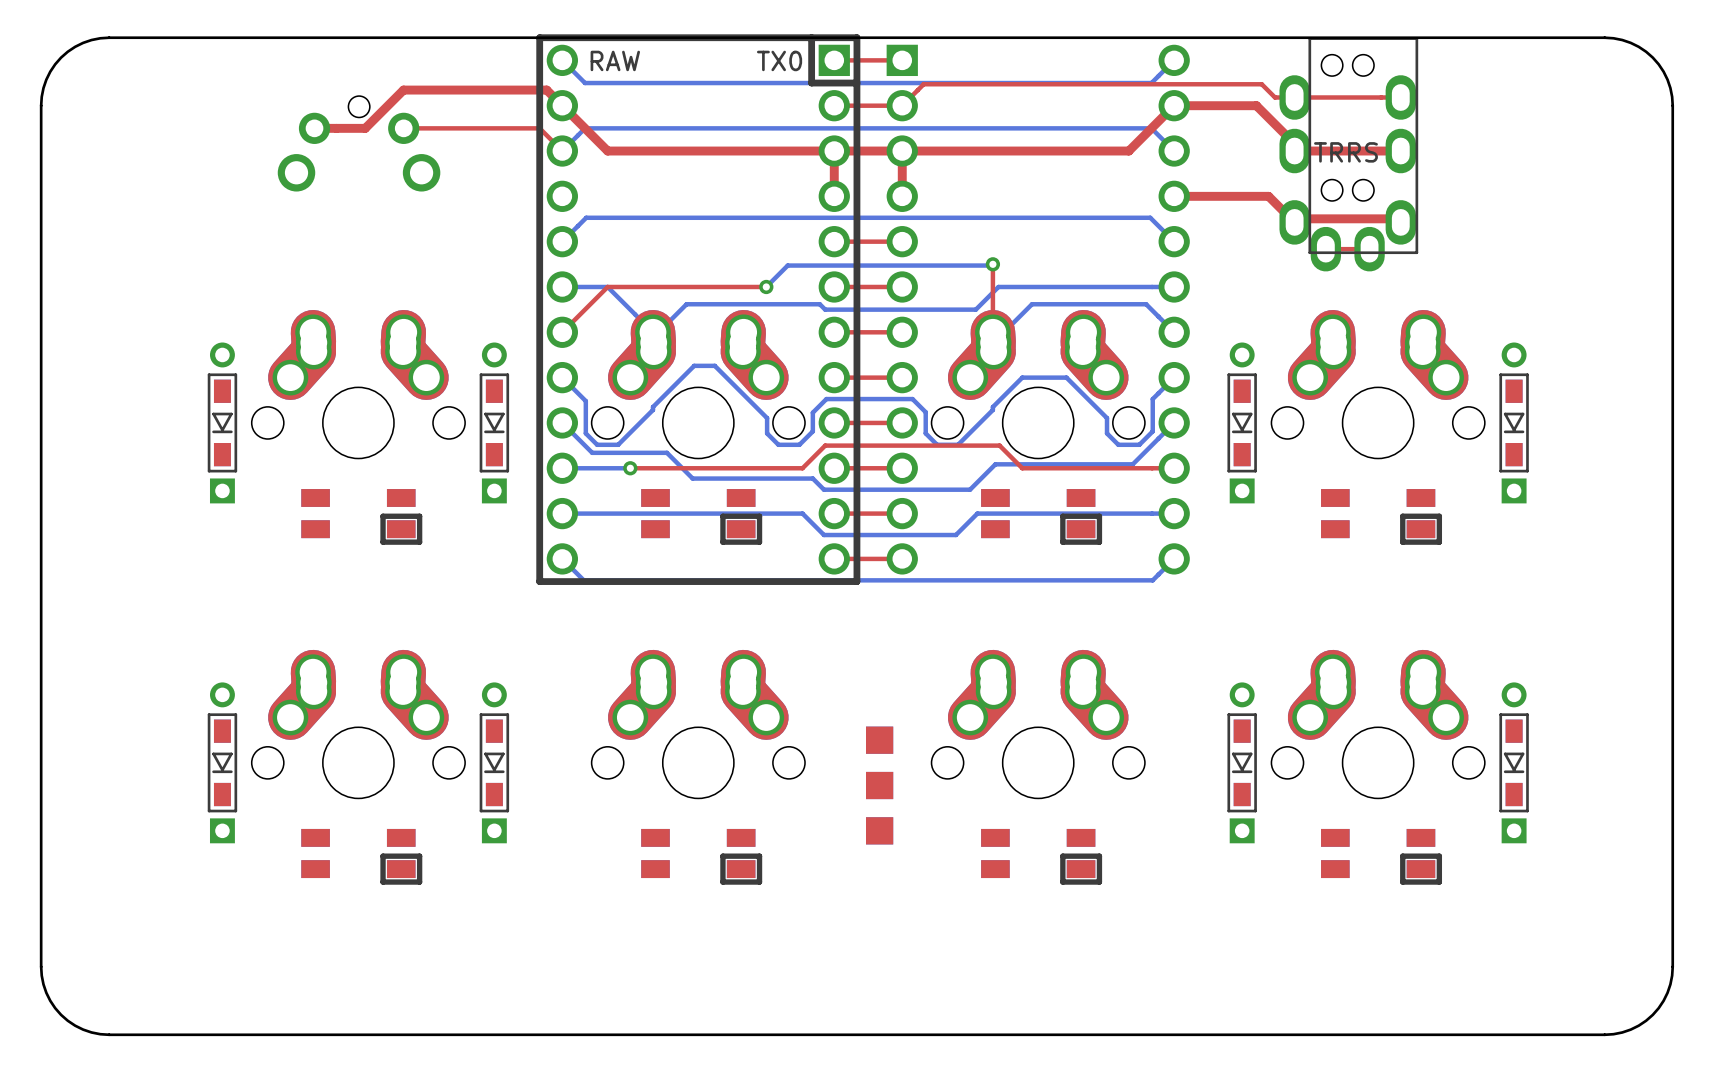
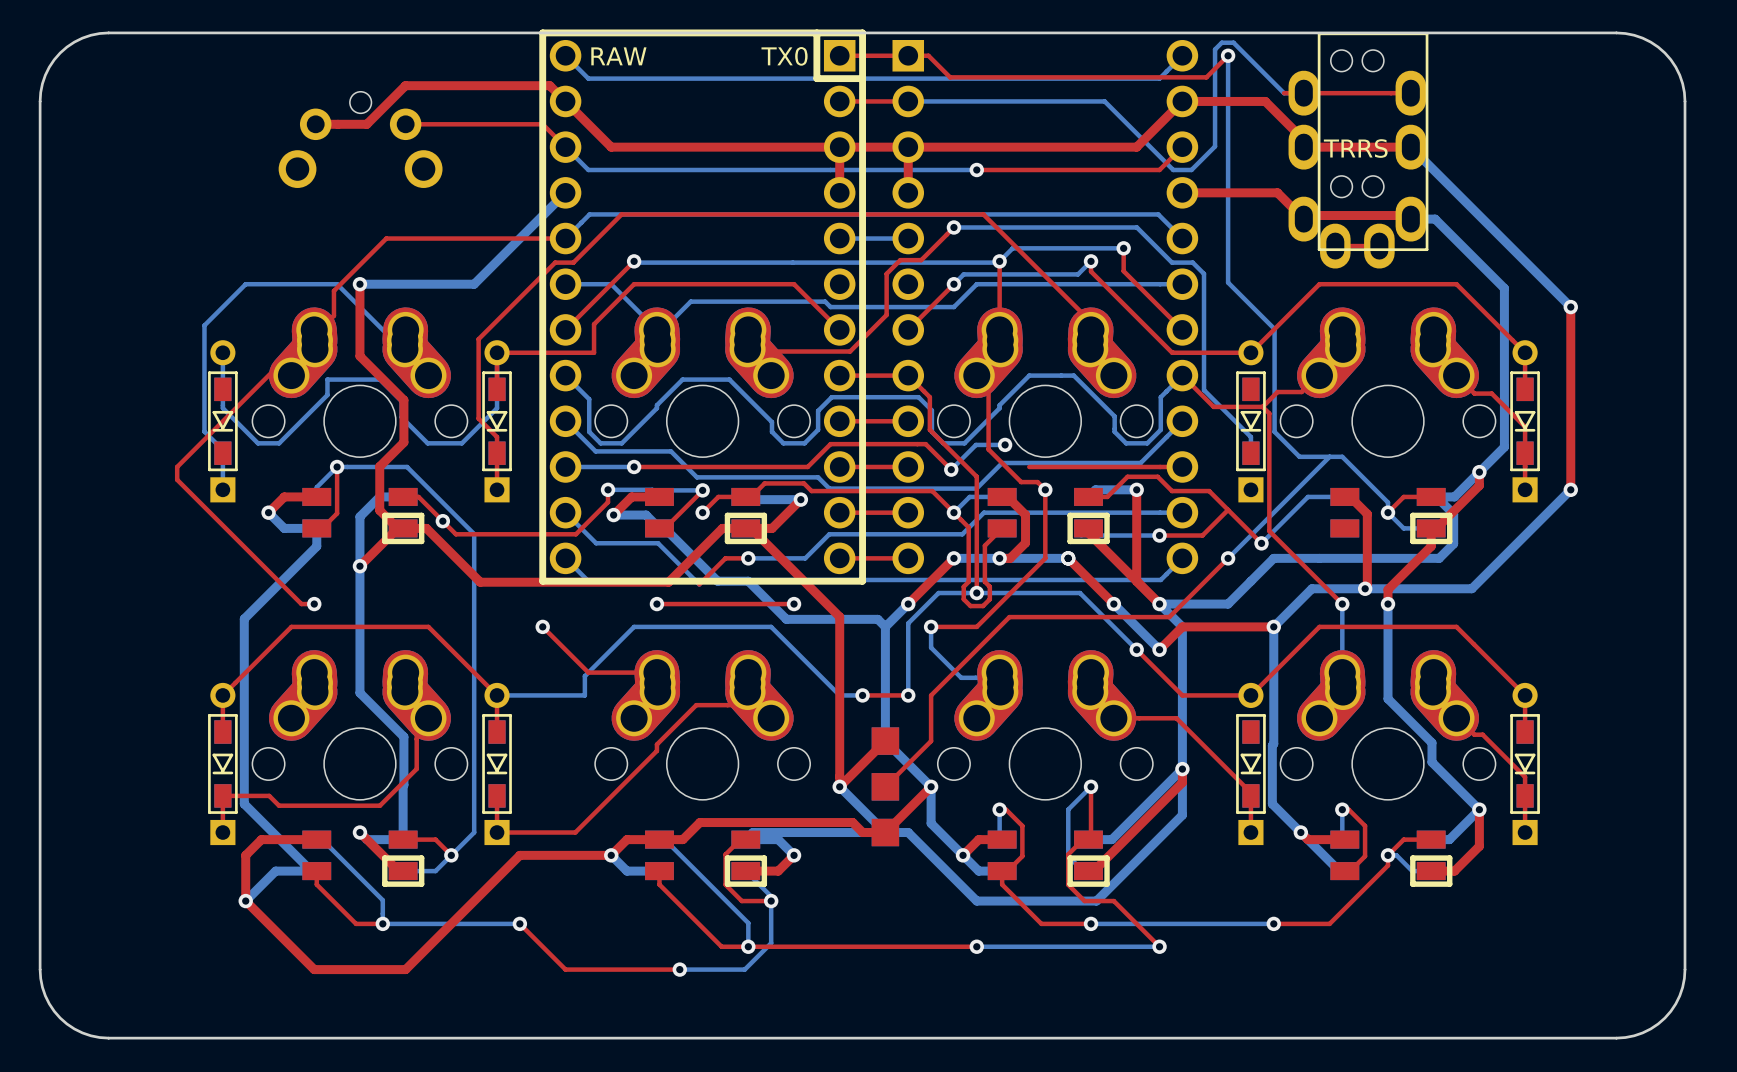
top track: none -> (908, 55) (928, 55) (950, 77) (1206, 77) (1228, 55)
bottom track: none -> (1228, 55) (1228, 282) (1274, 329) (1274, 431) (1299, 456) (1342, 456) (1388, 502) (1388, 512) (1403, 528) (1431, 528)
via: none -> (1228, 55)
top track: (1275, 97) (1261, 84) (923, 84) (902, 105) -> none
bottom track: none -> (1303, 93) (1284, 93) (1233, 42) (1221, 42) (1215, 49) (1215, 146) (1191, 169) (1173, 169) (1104, 101) (908, 101)
bottom track: (562, 151) (585, 128) (1151, 128) (1174, 151) -> (565, 147) (588, 169) (976, 169)
top track: none -> (1182, 147) (1159, 169) (976, 169)
bottom track: none -> (1410, 147) (1570, 307)
via: none -> (976, 169)
bottom track: none -> (565, 192) (474, 284) (359, 284)
bottom track: none -> (1410, 219) (1435, 219) (1504, 288) (1504, 447) (1454, 496) (1431, 496)
top track: none -> (953, 227) (921, 260) (900, 260) (886, 273) (886, 314) (850, 351) (775, 351) (773, 349) (747, 349)
bottom track: none -> (953, 227) (1136, 227) (1172, 262) (1192, 262) (1204, 273) (1204, 390) (1250, 437) (1250, 453)
via: none -> (953, 227)
top track: none -> (565, 238) (386, 238) (333, 290) (333, 315) (314, 335)
top track: (834, 241) (902, 241) -> none
bottom track: none -> (839, 238) (908, 238)
top track: none -> (1123, 248) (1123, 271) (1182, 329)
bottom track: none -> (1123, 248) (1012, 248) (999, 261)
via: none -> (1123, 248)
via: none -> (634, 261)
top track: none -> (1091, 261) (1091, 271) (1172, 352) (1250, 352) (1319, 284) (1456, 284) (1525, 352) (1525, 389)
bottom track: none -> (1091, 261) (1077, 274) (963, 274) (953, 284)
via: none -> (1091, 261)
bottom track: (787, 265) (766, 286) -> (792, 262) (634, 261)
top track: none -> (359, 284) (359, 356) (403, 400) (403, 442) (379, 466) (379, 510) (397, 528)
via: none -> (359, 284)
top track: (607, 286) (630, 286) -> (611, 284) (634, 261)
top track: none -> (634, 284) (594, 324) (594, 352) (497, 352) (497, 389)
top track: none -> (771, 284) (794, 284) (839, 329)
via: (766, 286) -> none
top track: (834, 286) (902, 286) -> none
via: none -> (953, 284)
bottom track: (998, 286) (975, 309) (947, 309) -> (1005, 284) (976, 284) (953, 307)
top track: none -> (1570, 307) (1570, 489)
via: none -> (1570, 307)
top track: none -> (314, 329) (177, 466) (177, 479) (301, 604) (314, 604)
top track: (834, 332) (902, 332) -> (953, 284) (908, 329)
bottom track: (1174, 332) (1146, 304) (1032, 304) (993, 342) -> none
top track: none -> (1090, 349) (1090, 321) (983, 214) (621, 214) (573, 262) (555, 262) (478, 339) (478, 418) (497, 437) (497, 489)
bottom track: none -> (222, 352) (222, 408) (258, 443) (279, 443) (327, 395) (327, 379) (379, 379) (401, 401) (401, 417) (427, 443) (461, 443) (497, 408) (497, 352)
top track: none -> (988, 362) (988, 449) (1021, 482) (1037, 482) (1045, 489) (1045, 558) (976, 626) (931, 626)
top track: none -> (1331, 362) (1301, 392) (1277, 392) (1262, 406)
bottom track: none -> (428, 375) (337, 284) (245, 284) (204, 325) (204, 431) (222, 450) (222, 489)
top track: none -> (908, 375) (929, 397) (929, 429) (976, 476) (976, 593)
top track: none -> (1182, 375) (1213, 406) (1262, 406)
top track: none -> (1456, 375) (1474, 393) (1491, 393) (1525, 426) (1525, 489)
bottom track: (678, 381) (694, 365) (714, 365) (767, 418) (767, 423) -> (682, 379) (729, 379) (771, 422)
top track: none -> (1262, 406) (1269, 413) (1269, 531) (1342, 604)
top track: (919, 445) (999, 445) (1022, 468) -> (925, 444) (951, 469)
bottom track: none -> (1005, 444) (976, 444) (951, 469)
via: none -> (1005, 444)
bottom track: none -> (1329, 456) (1228, 558)
top track: none -> (337, 466) (337, 513) (322, 528) (316, 528)
via: none -> (337, 466)
via: none -> (951, 469)
top track: none -> (1479, 472) (1479, 485) (1436, 528) (1431, 528) (1431, 546) (1388, 589) (1388, 604)
via: none -> (1479, 472)
top track: none -> (608, 489) (608, 502) (575, 534) (455, 534) (418, 496) (403, 496)
bottom track: none -> (608, 489) (652, 489) (659, 496) (666, 490) (702, 490)
via: none -> (608, 489)
via: none -> (1045, 489)
top track: none -> (1136, 489) (1136, 581)
bottom track: none -> (1136, 489) (1095, 489) (1088, 496)
via: none -> (1136, 489)
bottom track: none -> (1570, 489) (1471, 588) (1311, 588) (1273, 626) (1272, 804) (1339, 871) (1344, 871)
via: none -> (1570, 489)
top track: none -> (702, 490) (664, 528) (659, 528)
via: none -> (702, 490)
top track: none -> (316, 496) (284, 496) (268, 512)
bottom track: none -> (316, 496) (316, 487) (337, 466) (407, 466) (474, 534) (474, 832) (435, 871) (403, 871)
bottom track: none -> (403, 496) (379, 496) (359, 516) (359, 692) (403, 736) (403, 839) (367, 839) (359, 832)
top track: none -> (659, 496) (631, 496) (613, 515)
bottom track: none -> (745, 496) (748, 499) (800, 499)
top track: none -> (1002, 496) (1007, 496) (1025, 514) (1025, 542) (1010, 558) (999, 558)
bottom track: none -> (1002, 496) (969, 496) (953, 512)
top track: none -> (1083, 496) (1107, 496) (1127, 476) (1157, 476) (1172, 491) (1209, 491) (1261, 543)
top track: none -> (1344, 496) (1350, 496) (1367, 514) (1367, 586) (1365, 588)
bottom track: none -> (1344, 496) (1307, 496) (1261, 543)
top track: none -> (1431, 496) (1403, 496) (1388, 512)
bottom track: none -> (1436, 496) (1453, 514) (1453, 543) (1439, 558) (1273, 558) (1228, 604) (1159, 604) (1182, 626) (1182, 815) (1096, 901) (976, 901) (908, 832) (752, 832) (745, 839) (778, 839) (794, 855)
top track: none -> (800, 499) (772, 528) (722, 528) (668, 582) (480, 582) (426, 528) (397, 528)
via: none -> (800, 499)
top track: none -> (1228, 509) (1202, 535) (1159, 535)
bottom track: none -> (268, 512) (284, 528) (316, 528) (316, 546) (244, 618) (244, 804) (311, 871)
via: none -> (268, 512)
bottom track: (562, 513) (802, 513) (823, 535) -> (565, 512) (596, 543) (658, 543) (699, 584)
top track: none -> (702, 512) (718, 496) (751, 496) (764, 483) (803, 483) (811, 491) (932, 491) (968, 527) (968, 581) (963, 586) (963, 599) (970, 606) (983, 606) (989, 599) (989, 586) (984, 581) (984, 545) (1002, 528)
via: none -> (702, 512)
via: none -> (953, 512)
via: none -> (1388, 512)
bottom track: none -> (613, 515) (646, 515) (659, 528) (664, 528) (717, 581) (748, 581) (786, 619) (877, 619) (885, 626)
via: none -> (613, 515)
via: none -> (442, 521)
top track: none -> (397, 528) (359, 566)
top track: none -> (751, 528) (839, 616) (839, 786) (885, 741)
top track: none -> (1098, 528) (1088, 528) (1088, 533) (1159, 604)
bottom track: none -> (829, 534) (805, 558) (748, 558)
bottom track: none -> (1081, 535) (1088, 528) (1095, 535) (1159, 535)
via: none -> (1159, 535)
via: none -> (1261, 543)
top track: none -> (748, 558) (725, 558) (699, 584)
via: none -> (748, 558)
top track: none -> (953, 558) (908, 604)
bottom track: none -> (953, 558) (1068, 558)
via: none -> (953, 558)
via: none -> (999, 558)
top track: none -> (1068, 558) (1113, 604)
via: none -> (1068, 558)
top track: none -> (1228, 558) (1169, 617) (1009, 617) (931, 695) (931, 741) (885, 786)
via: none -> (1228, 558)
via: none -> (359, 566)
via: none -> (1365, 588)
via: none -> (976, 593)
via: none -> (314, 604)
top track: none -> (656, 604) (794, 604)
via: none -> (656, 604)
via: none -> (794, 604)
bottom track: none -> (908, 604) (885, 626)
via: none -> (908, 604)
bottom track: none -> (1113, 604) (1159, 649)
via: none -> (1113, 604)
via: none -> (1159, 604)
bottom track: none -> (1342, 604) (1342, 672)
via: none -> (1342, 604)
bottom track: none -> (1388, 604) (1388, 698) (1431, 742) (1431, 762) (1479, 809) (1449, 839) (1431, 839)
via: none -> (1388, 604)
top track: none -> (542, 626) (588, 672) (656, 672)
via: none -> (542, 626)
bottom track: none -> (885, 626) (885, 741) (931, 786) (931, 823) (978, 871) (1002, 871)
bottom track: none -> (931, 626) (931, 647) (961, 677) (999, 677)
via: none -> (931, 626)
top track: none -> (1273, 626) (1182, 626) (1159, 649)
via: none -> (1273, 626)
top track: none -> (1136, 649) (1182, 695) (1250, 695) (1319, 626) (1456, 626) (1525, 695) (1525, 732)
bottom track: none -> (1136, 649) (1079, 593) (938, 593) (908, 623) (908, 695)
via: none -> (1136, 649)
via: none -> (1159, 649)
bottom track: none -> (497, 695) (584, 695) (584, 676) (634, 626) (771, 626) (839, 695) (862, 695)
top track: none -> (862, 695) (908, 695)
via: none -> (862, 695)
via: none -> (908, 695)
top track: none -> (416, 705) (416, 768) (379, 805) (279, 805) (269, 795) (222, 795) (222, 832)
top track: none -> (759, 705) (696, 705) (656, 744) (656, 750) (575, 832) (497, 832) (497, 795)
top track: none -> (1444, 705) (1474, 734) (1482, 734) (1525, 777) (1525, 832)
top track: none -> (1113, 718) (1176, 718) (1250, 792) (1250, 832)
top track: none -> (222, 732) (222, 695) (291, 626) (428, 626) (497, 695) (497, 732)
top track: none -> (1182, 769) (1182, 782) (1093, 871) (1088, 871)
bottom track: none -> (1182, 769) (1111, 839) (1088, 839)
via: none -> (1182, 769)
bottom track: none -> (839, 786) (885, 832)
via: none -> (839, 786)
top track: none -> (931, 786) (885, 832) (862, 832) (852, 822) (699, 822) (682, 839) (627, 839) (611, 855) (519, 855) (405, 969) (314, 969) (245, 901) (245, 855) (261, 839) (316, 839)
via: none -> (931, 786)
top track: none -> (1091, 786) (1091, 837) (1088, 839) (1083, 839) (1068, 854) (1068, 884) (1084, 901) (1113, 901) (1159, 946)
bottom track: none -> (1091, 786) (1068, 809) (1068, 856) (1083, 871) (1088, 871)
via: none -> (1091, 786)
top track: none -> (999, 809) (1006, 809) (1022, 825) (1022, 856) (1007, 871) (1002, 871) (1002, 884) (1041, 923) (1091, 923)
bottom track: none -> (999, 809) (999, 837) (1002, 839)
via: none -> (999, 809)
top track: none -> (1342, 809) (1348, 809) (1365, 825) (1365, 856) (1350, 871) (1344, 871)
bottom track: none -> (1342, 809) (1342, 837) (1344, 839)
via: none -> (1342, 809)
top track: none -> (1479, 809) (1479, 846) (1454, 871) (1431, 871)
via: none -> (1479, 809)
top track: none -> (359, 832) (398, 871) (403, 871)
via: none -> (359, 832)
top track: none -> (1300, 832) (1307, 839) (1344, 839)
via: none -> (1300, 832)
bottom track: none -> (316, 839) (322, 839) (382, 900) (382, 923) (519, 923)
top track: none -> (403, 839) (435, 839) (451, 855)
bottom track: none -> (659, 839) (664, 839) (748, 923) (748, 946)
top track: none -> (745, 839) (740, 839) (725, 854) (725, 884) (741, 901) (771, 901)
top track: none -> (1002, 839) (978, 839) (963, 855)
top track: none -> (1431, 839) (1403, 839) (1388, 855) (1388, 865) (1329, 923) (1273, 923)
via: none -> (451, 855)
bottom track: none -> (611, 855) (627, 871) (659, 871)
via: none -> (611, 855)
top track: none -> (794, 855) (778, 871) (745, 871)
via: none -> (794, 855)
via: none -> (963, 855)
bottom track: none -> (1388, 855) (1396, 855) (1412, 871) (1431, 871)
via: none -> (1388, 855)
top track: none -> (316, 871) (316, 884) (356, 923) (382, 923)
bottom track: none -> (316, 871) (275, 871) (245, 901)
top track: none -> (659, 871) (659, 884) (721, 946) (976, 946)
bottom track: none -> (745, 871) (771, 896) (771, 943) (744, 969) (679, 969)
via: none -> (245, 901)
via: none -> (771, 901)
via: none -> (382, 923)
top track: none -> (519, 923) (565, 969) (679, 969)
via: none -> (519, 923)
bottom track: none -> (1091, 923) (1273, 923)
via: none -> (1091, 923)
via: none -> (1273, 923)
via: none -> (748, 946)
bottom track: none -> (976, 946) (1159, 946)
via: none -> (976, 946)
via: none -> (1159, 946)
via: none -> (679, 969)

